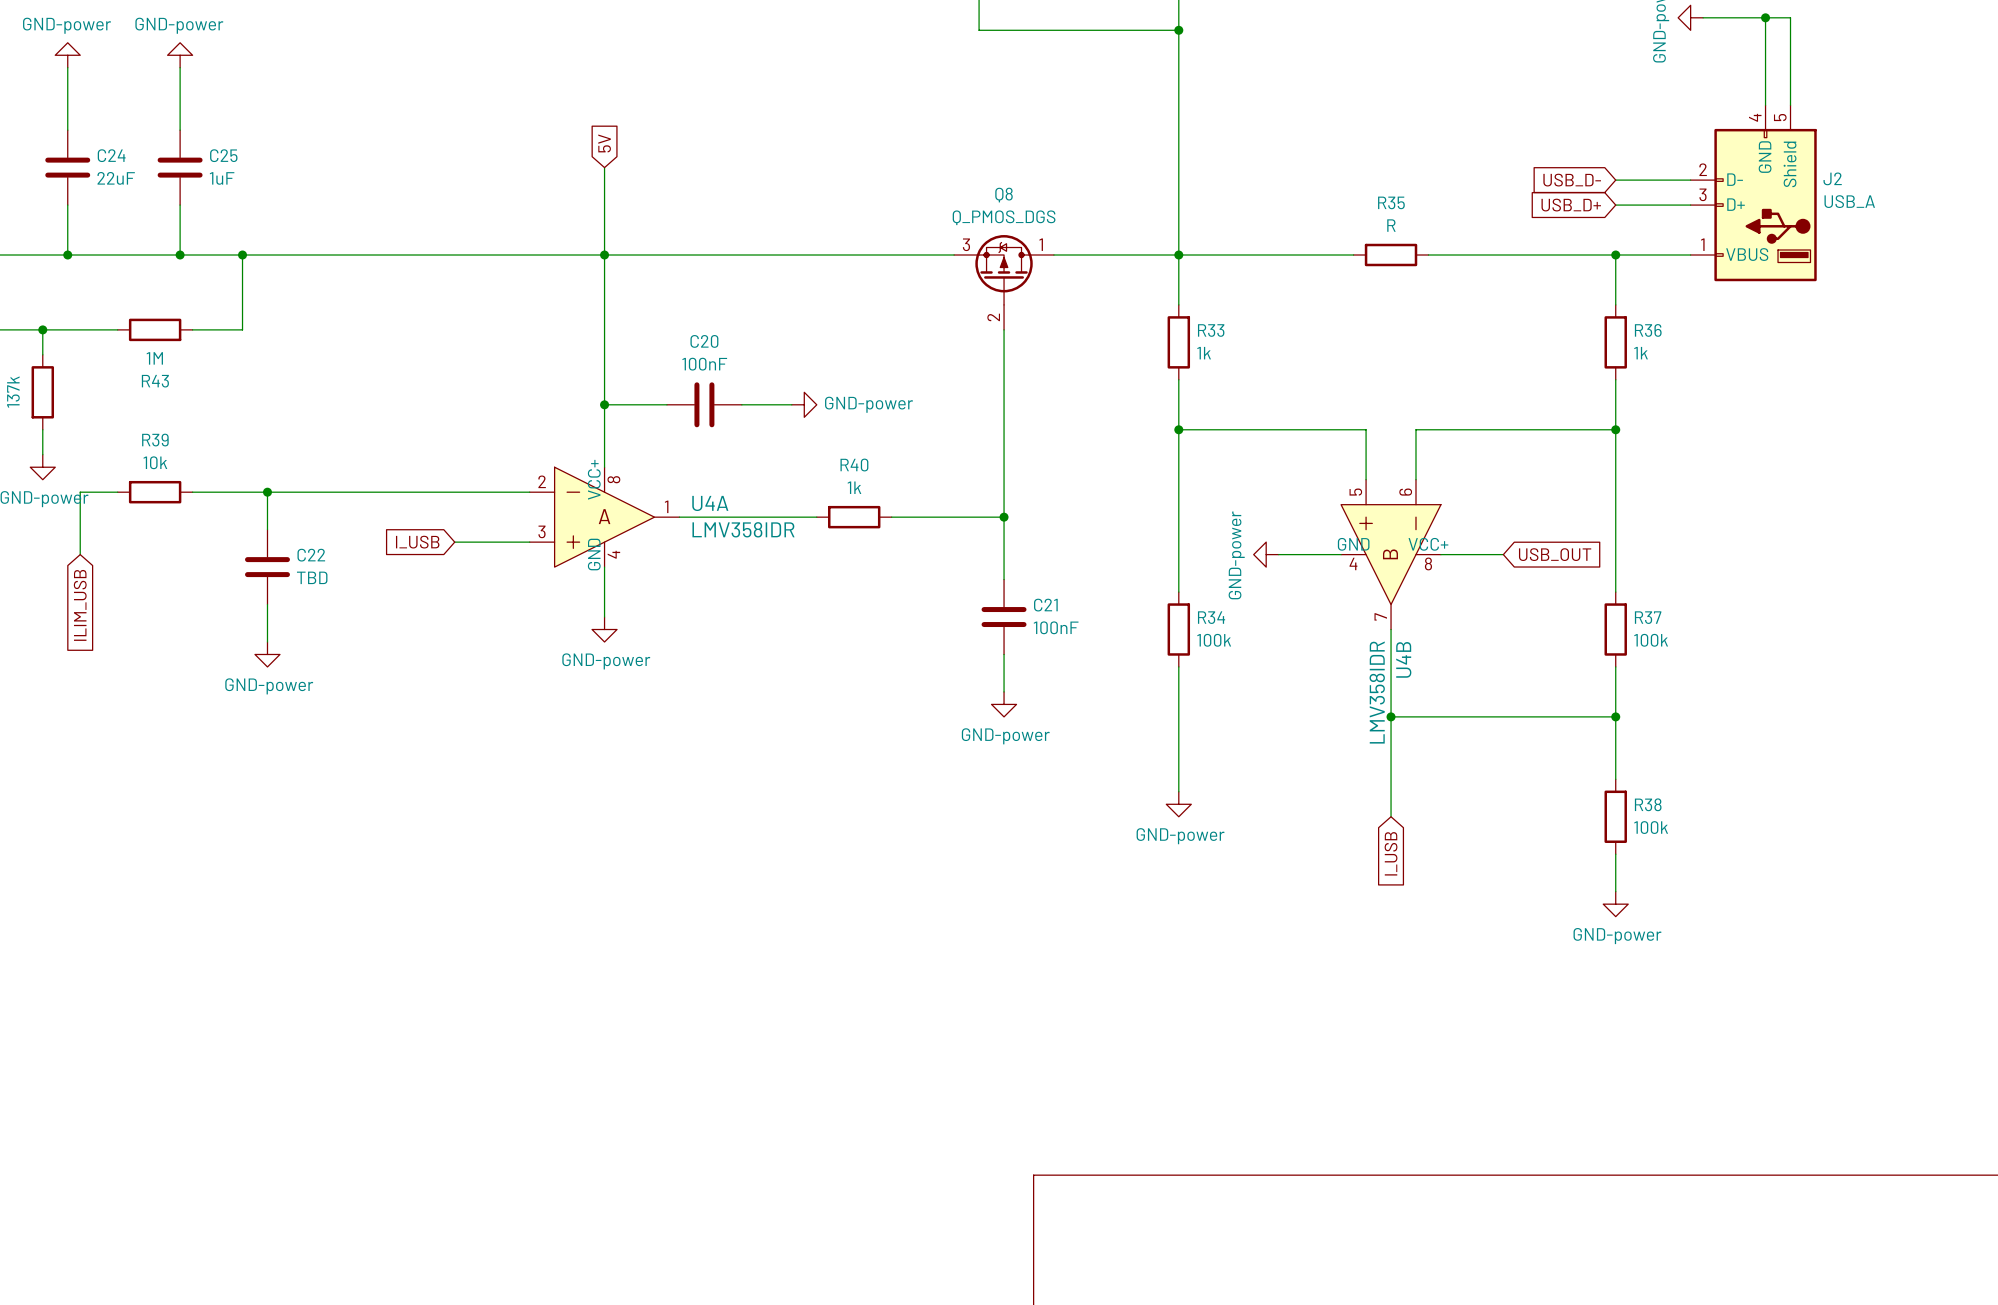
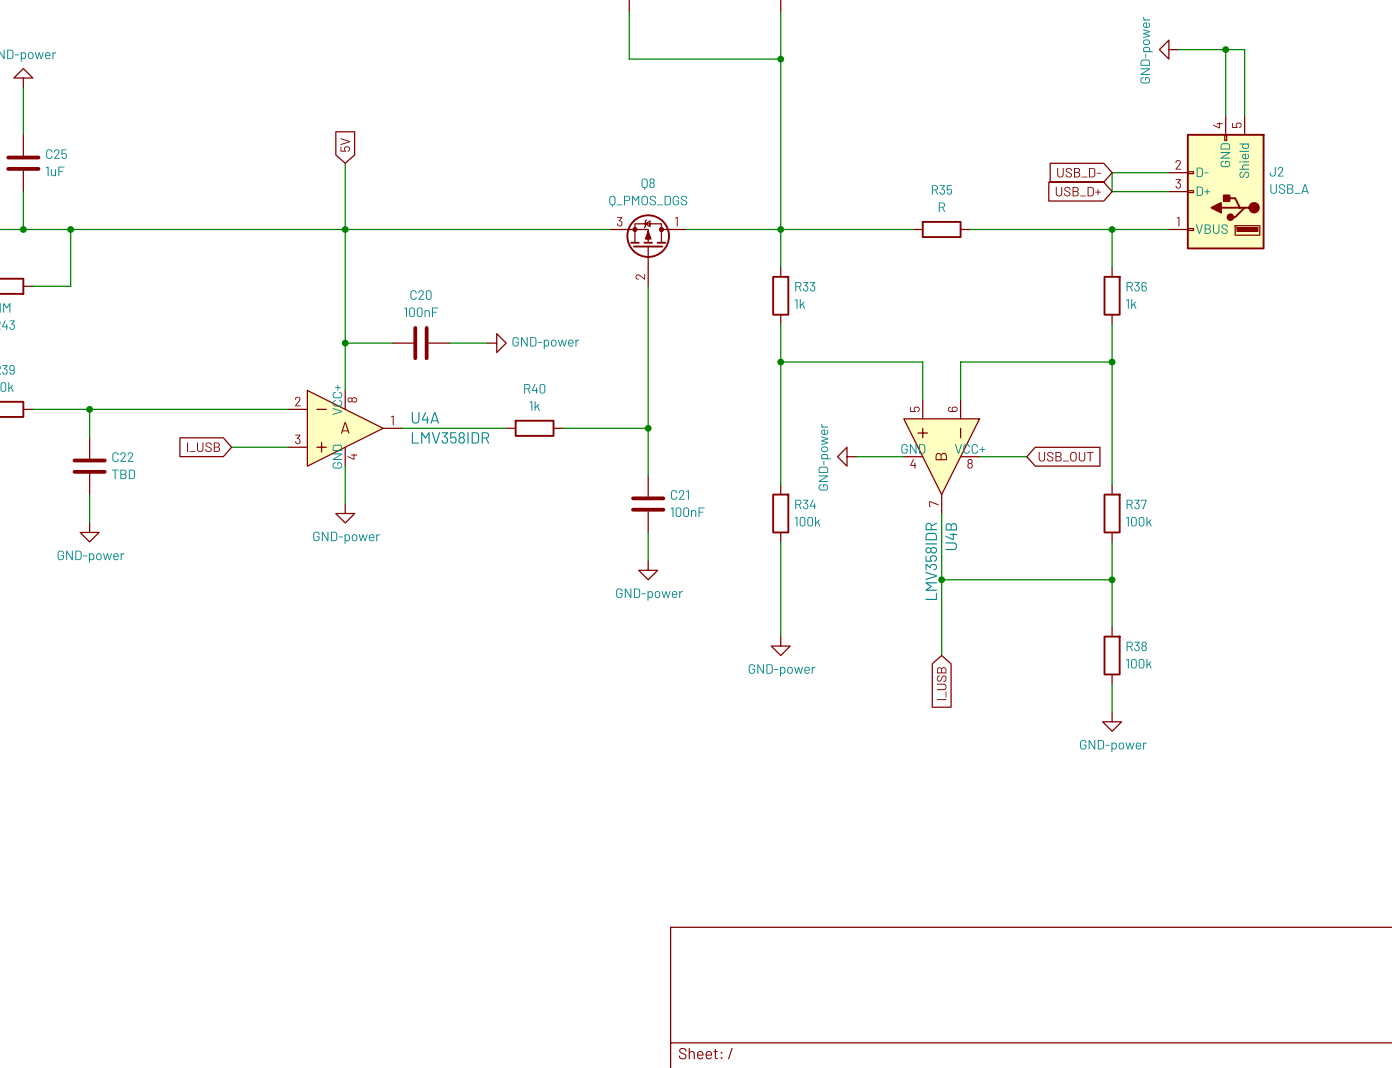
wire: none -> (1112, 172) (1112, 191)

